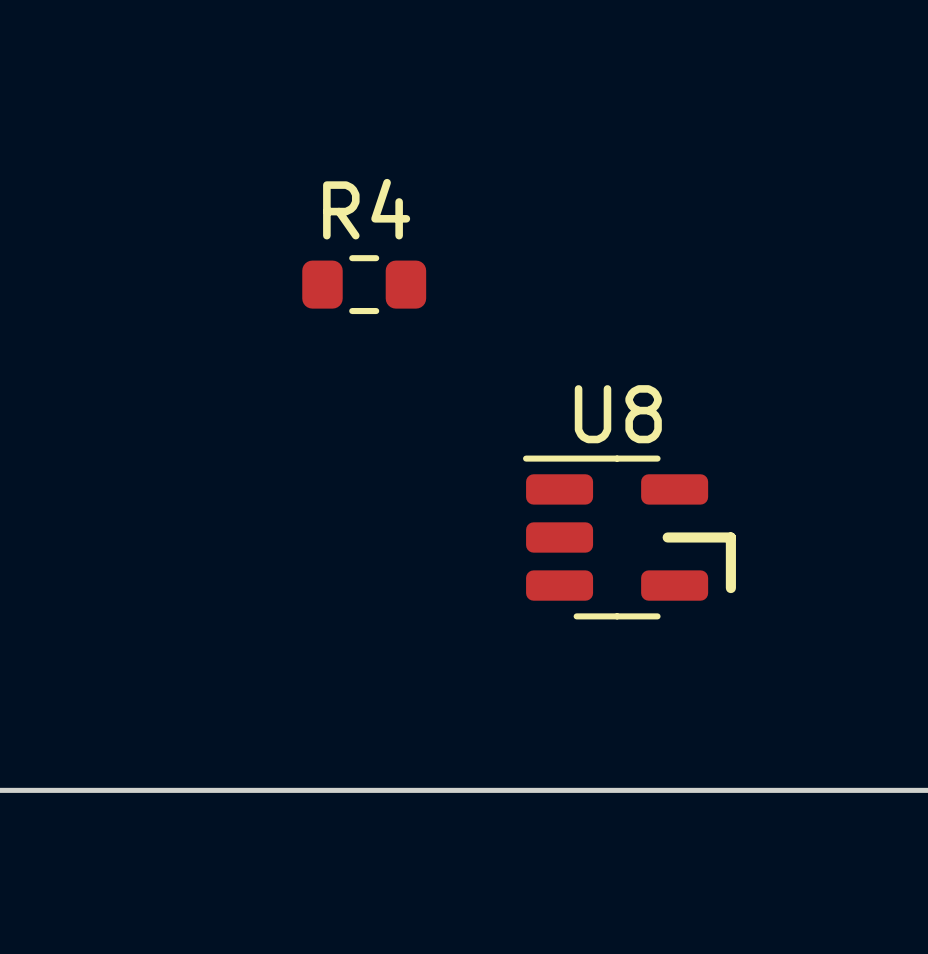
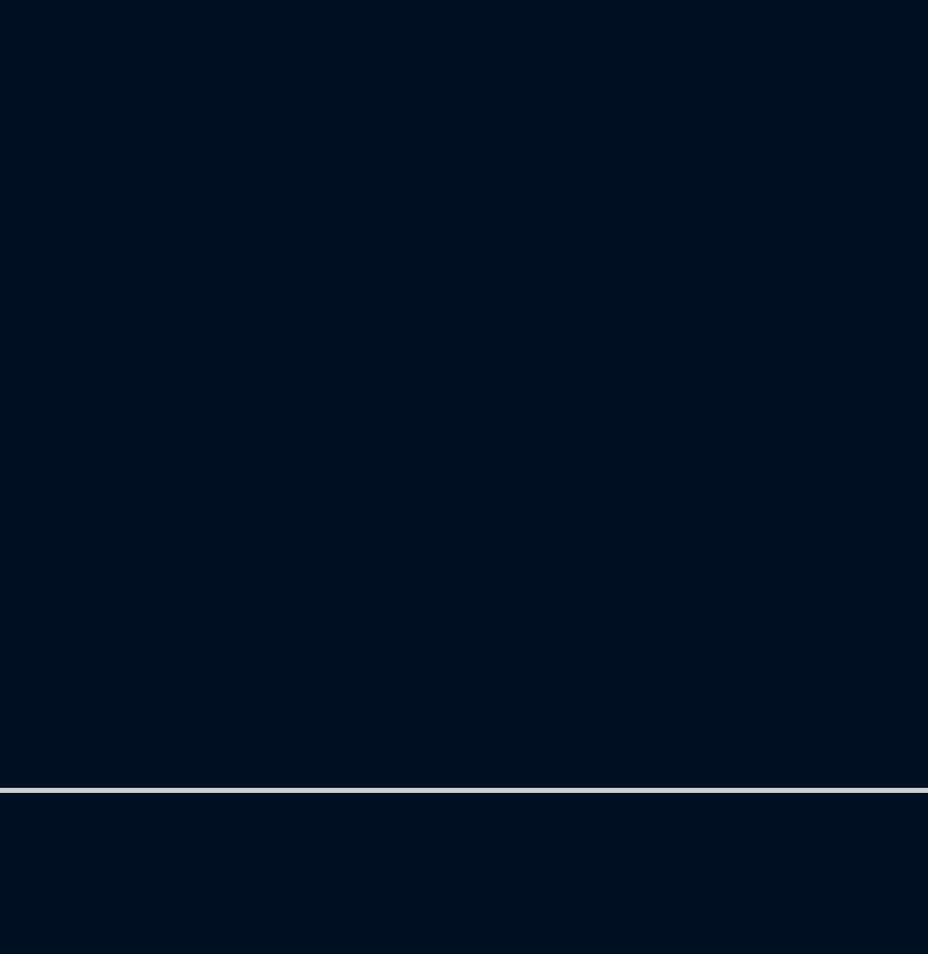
R4: (364, 284) -> none
U8: (629, 537) -> none

